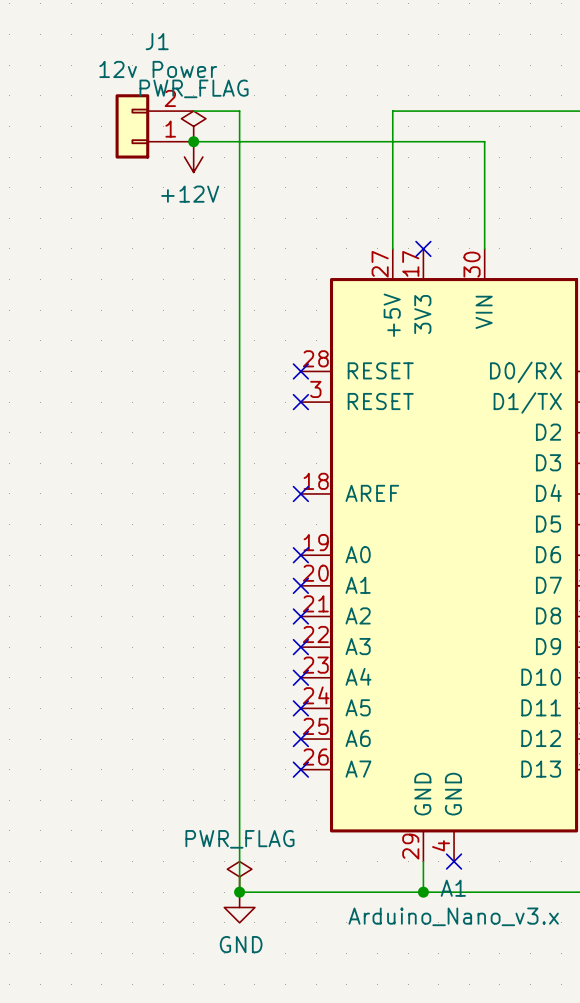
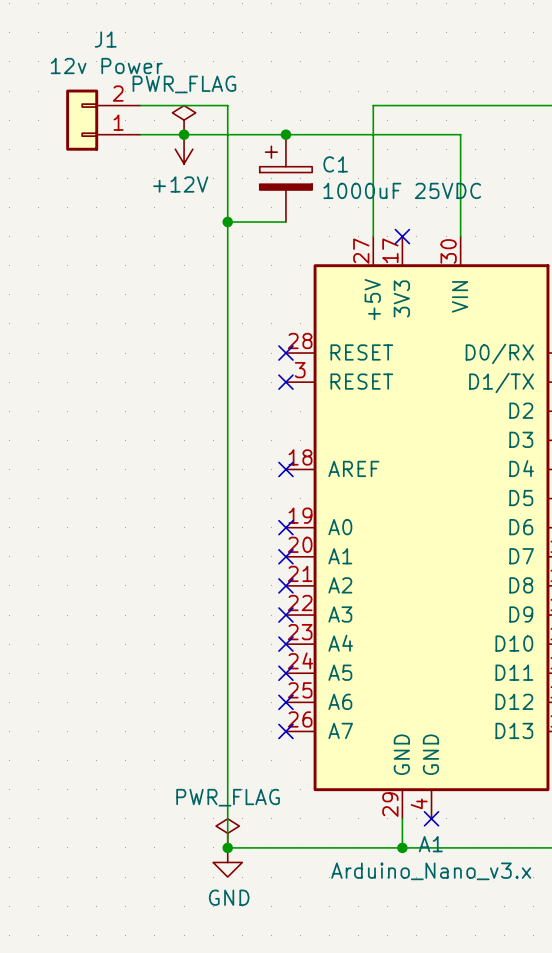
J1 position: (154, 126) -> (103, 120)
junction: none -> (285, 134)
C1: none -> 1000uF 25VDC (285, 178)
wire: none -> (227, 222) (285, 222)
junction: none -> (227, 222)

